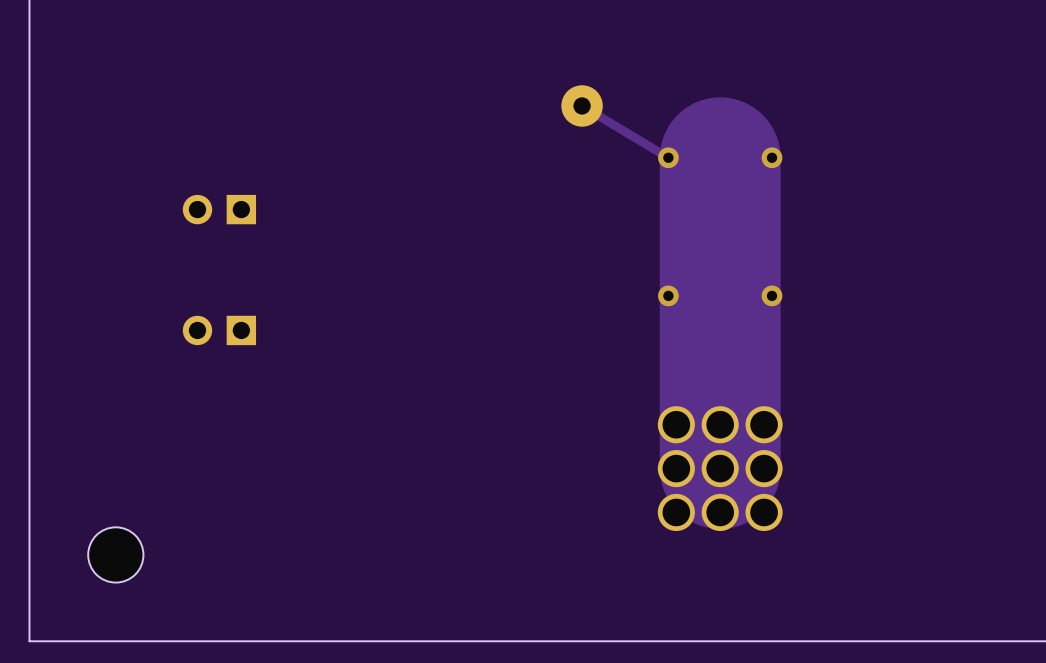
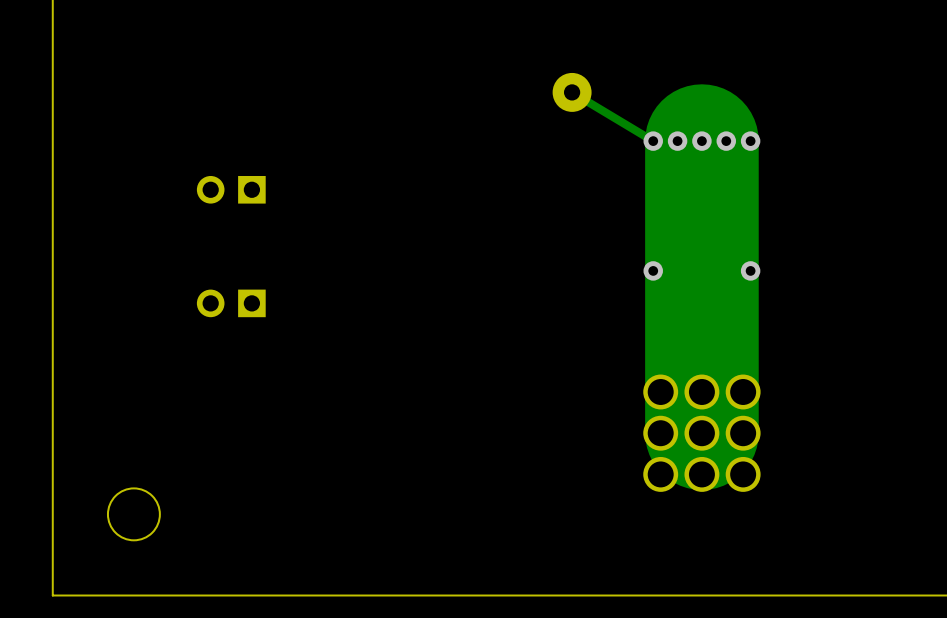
via: none -> (677, 141)
via: none -> (701, 141)
via: none -> (726, 141)

